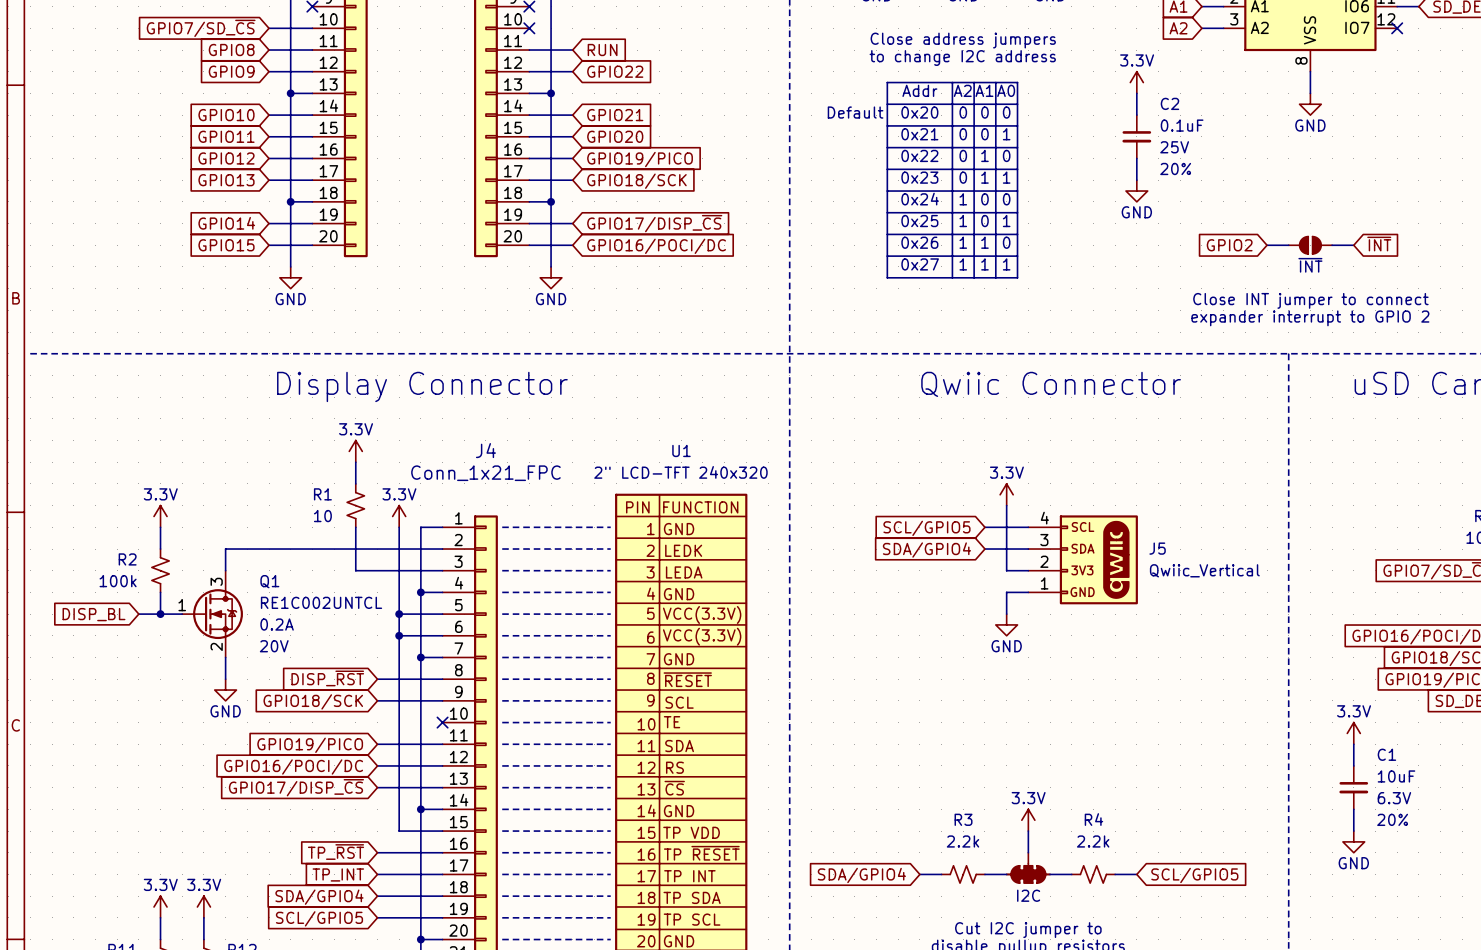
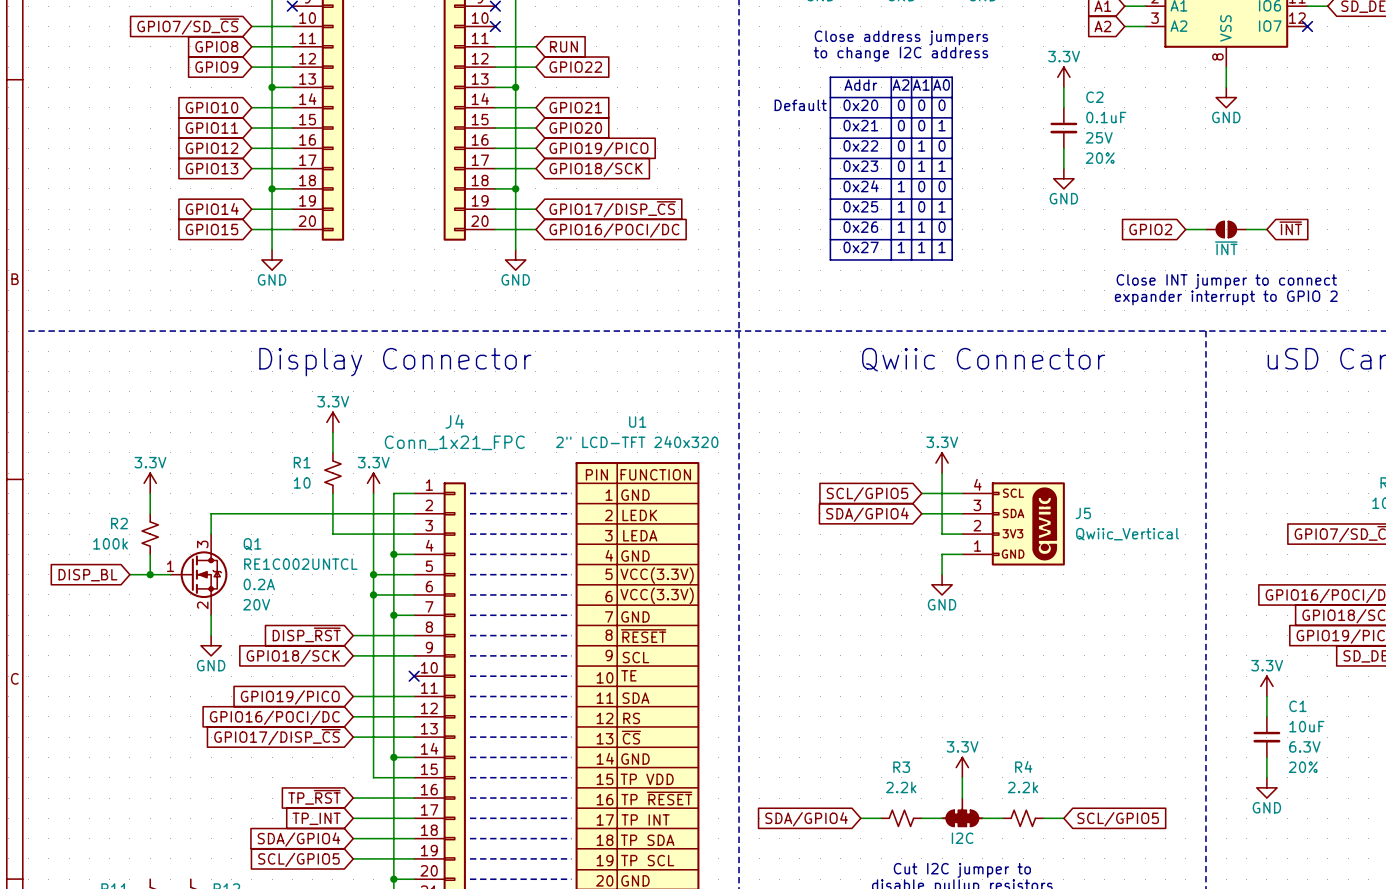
power symbol: 3.3V (160, 906) -> none
power symbol: 3.3V (203, 906) -> none
wire: (160, 917) (160, 939) -> none
wire: (203, 917) (203, 939) -> none

